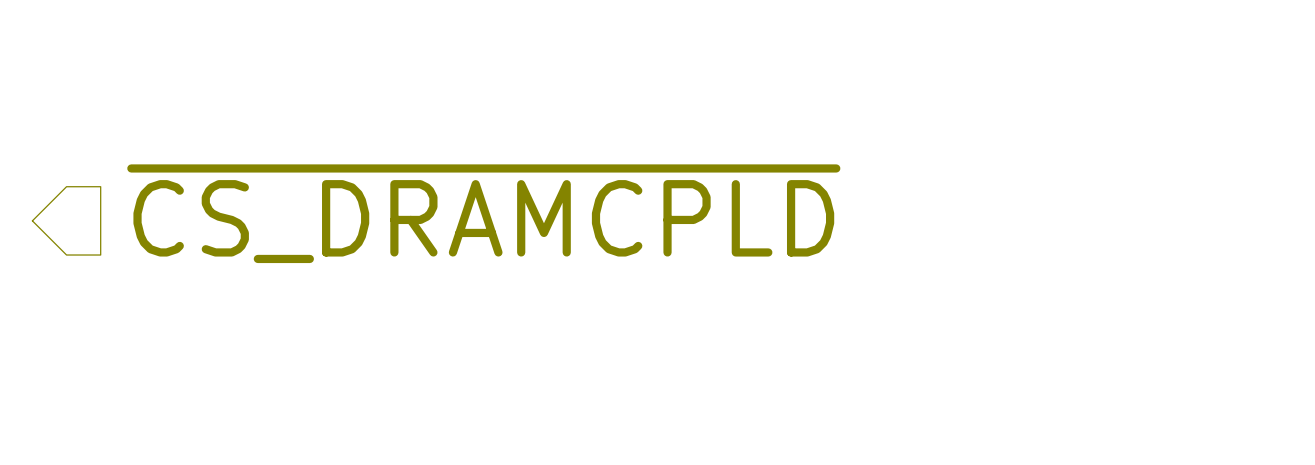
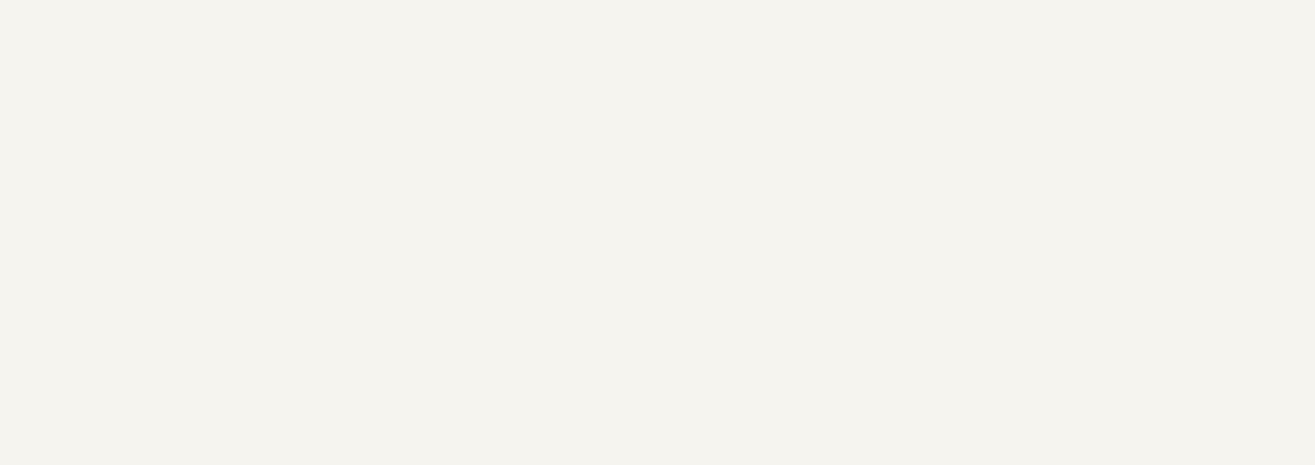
hierarchical label: ~{CS_DRAMCPLD} (483, 213) -> none

